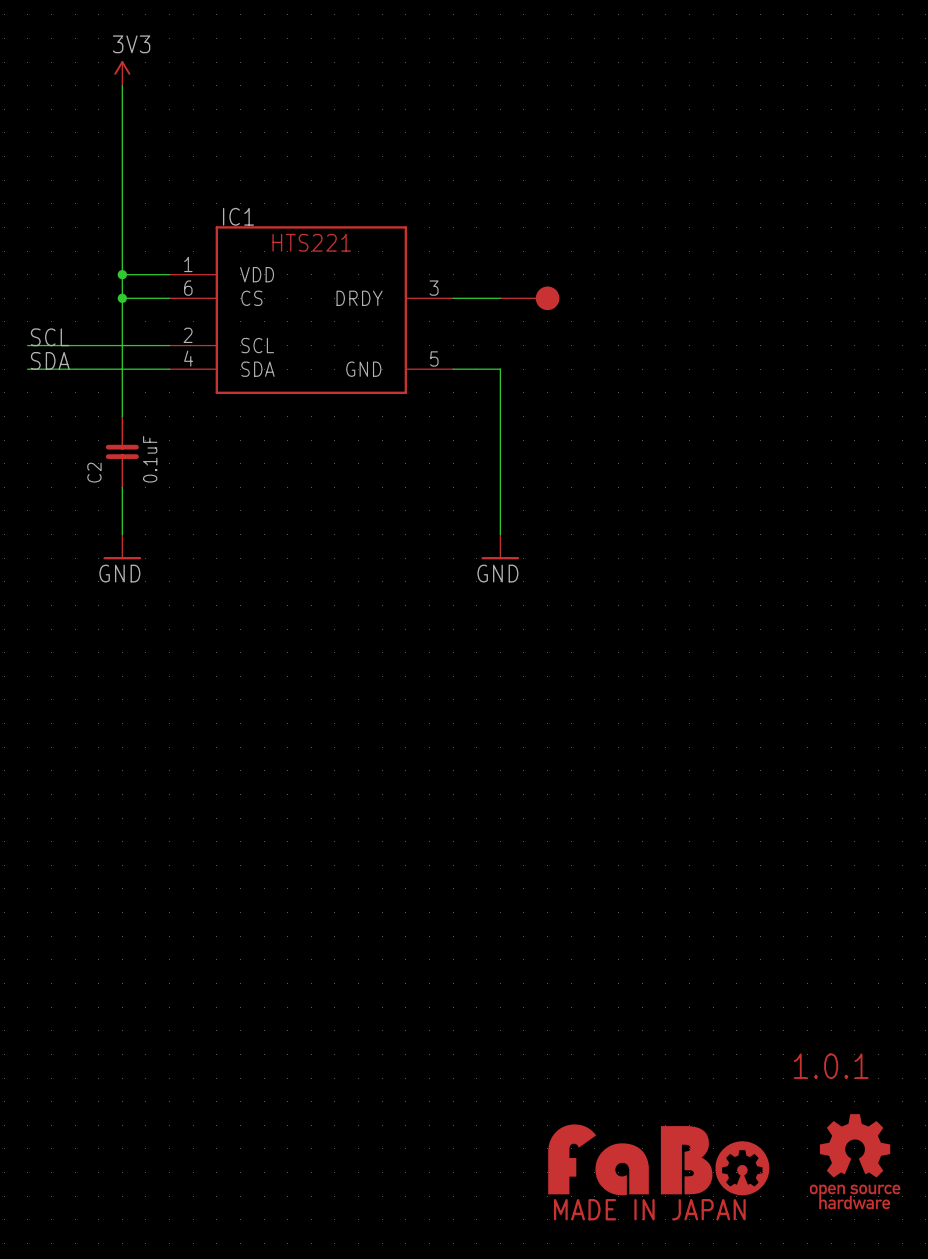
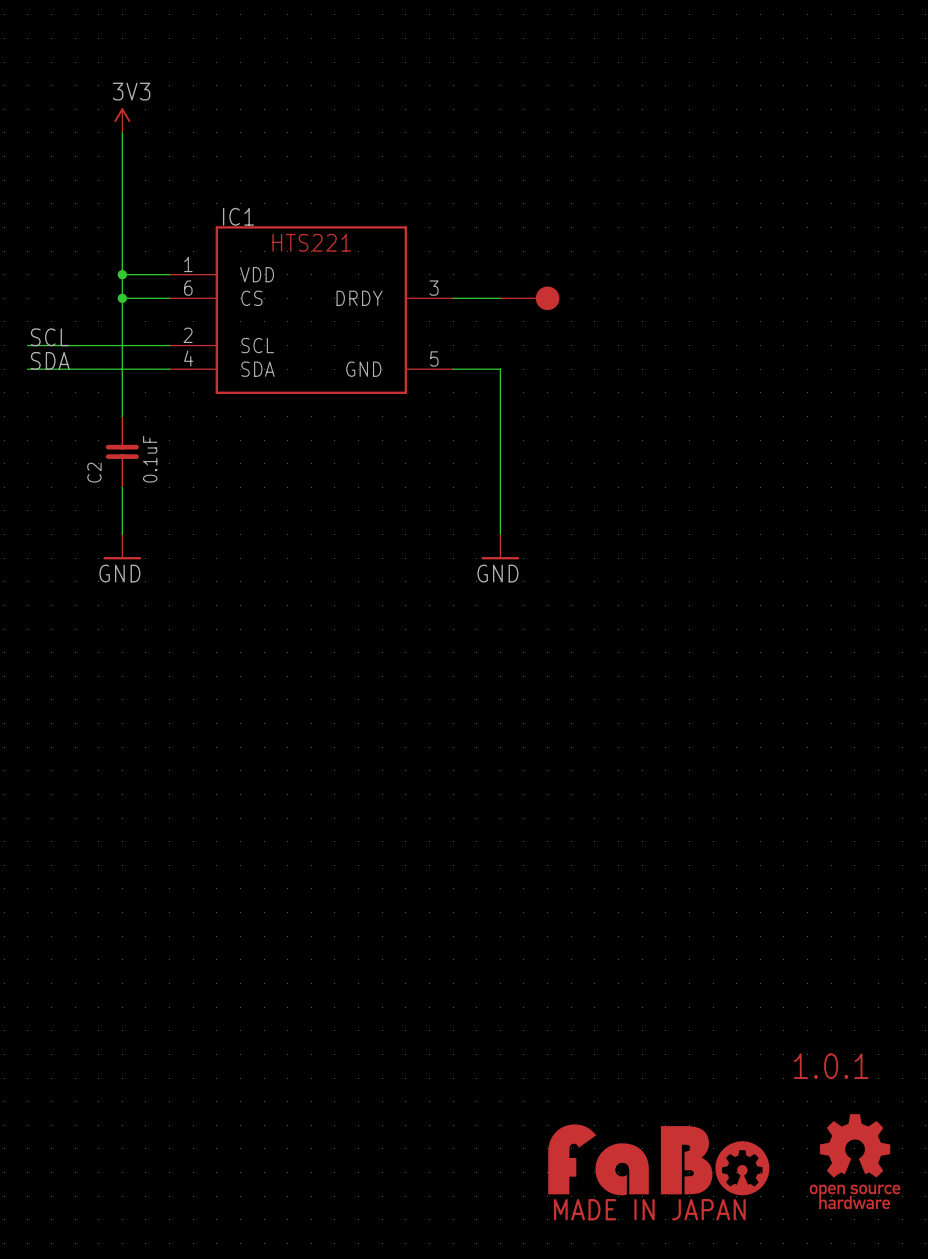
power symbol position: 3V3 (122, 73) -> 3V3 (122, 120)

